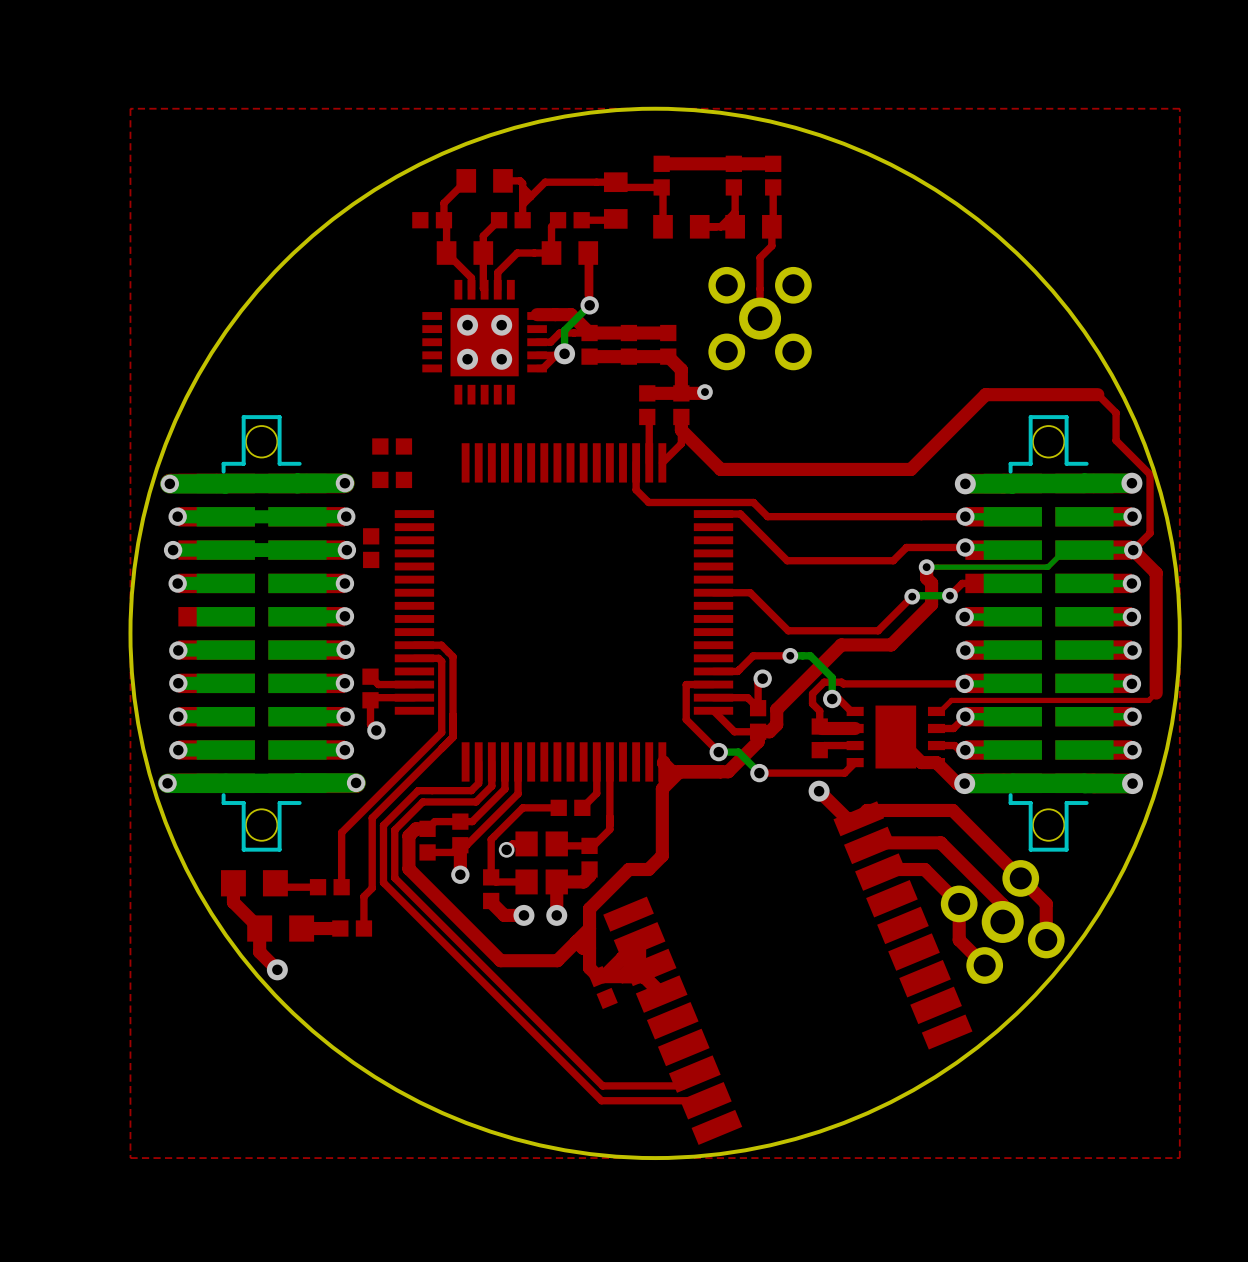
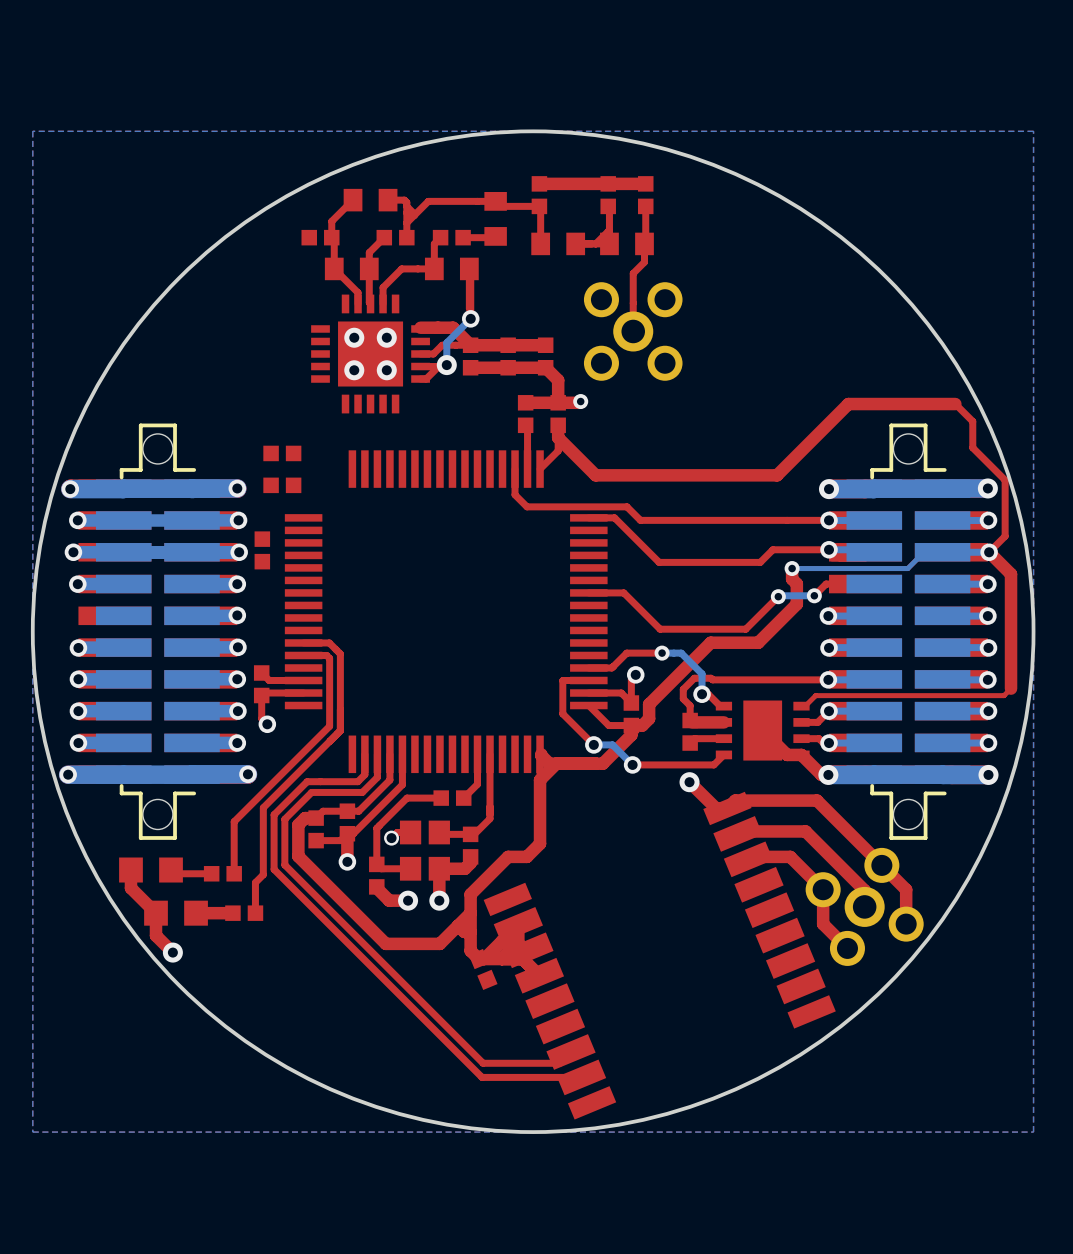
bottom zone outline: none -> (1033, 131) (32, 131) (32, 1132) (1033, 1132) (1033, 131)

